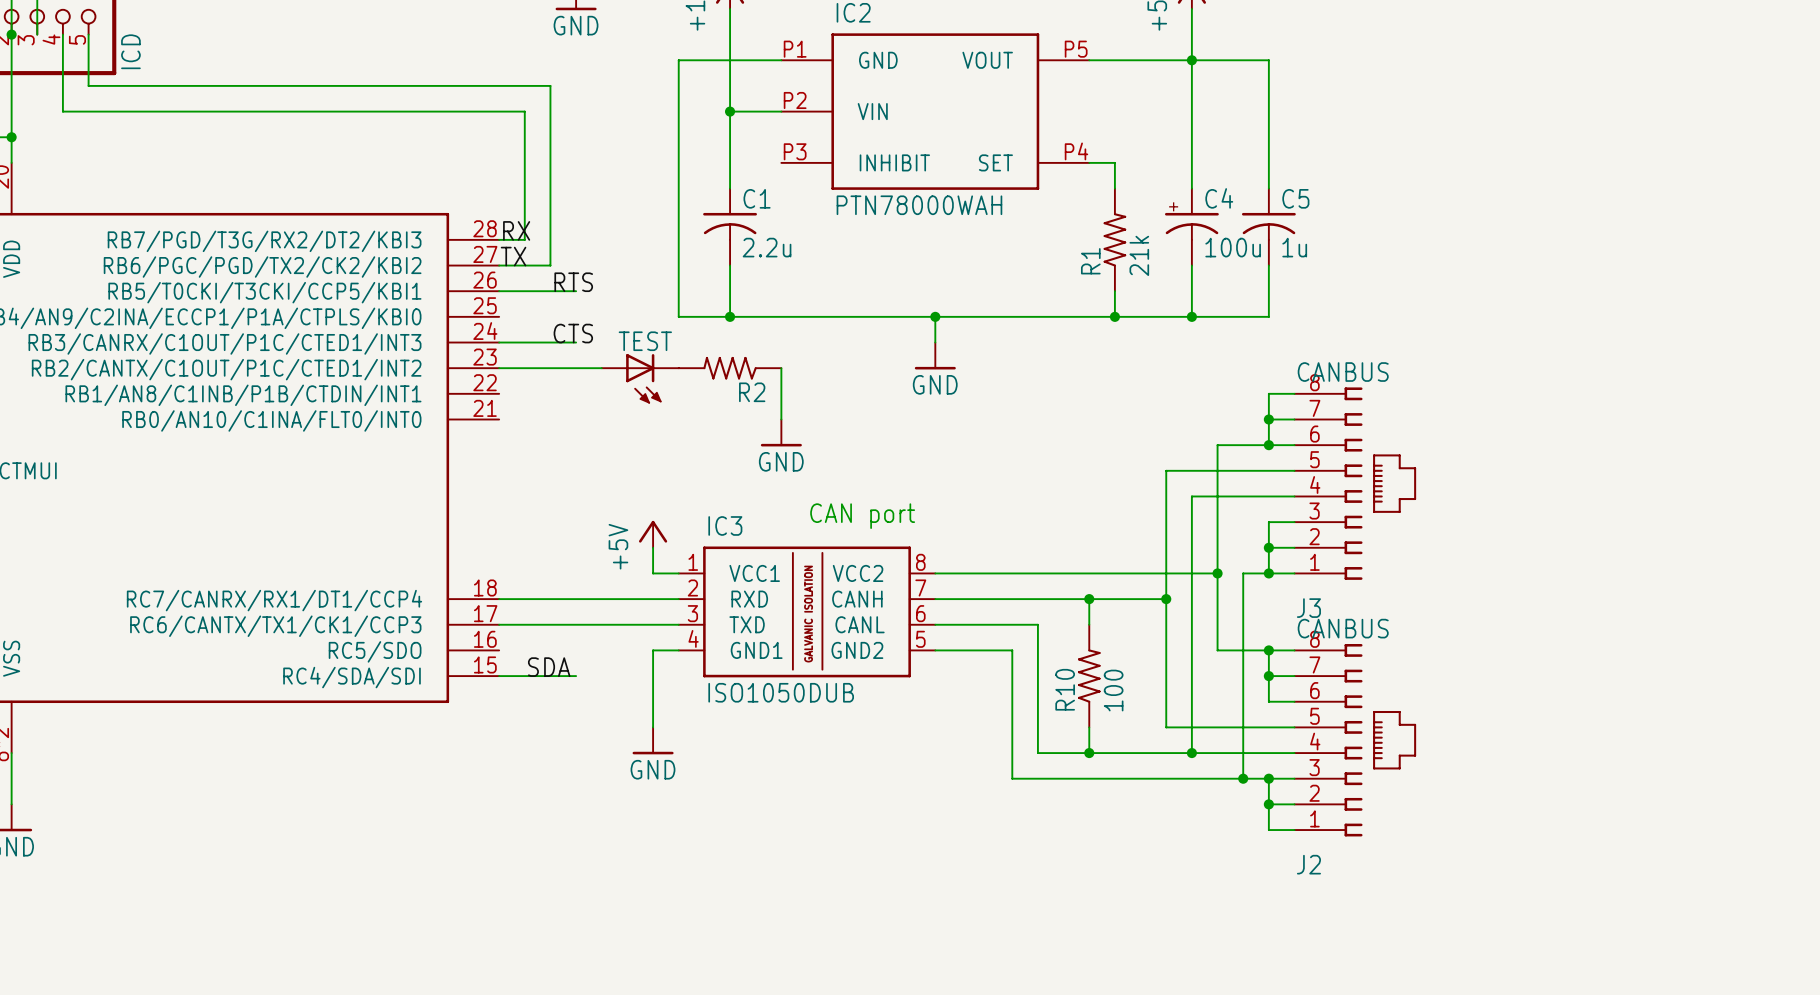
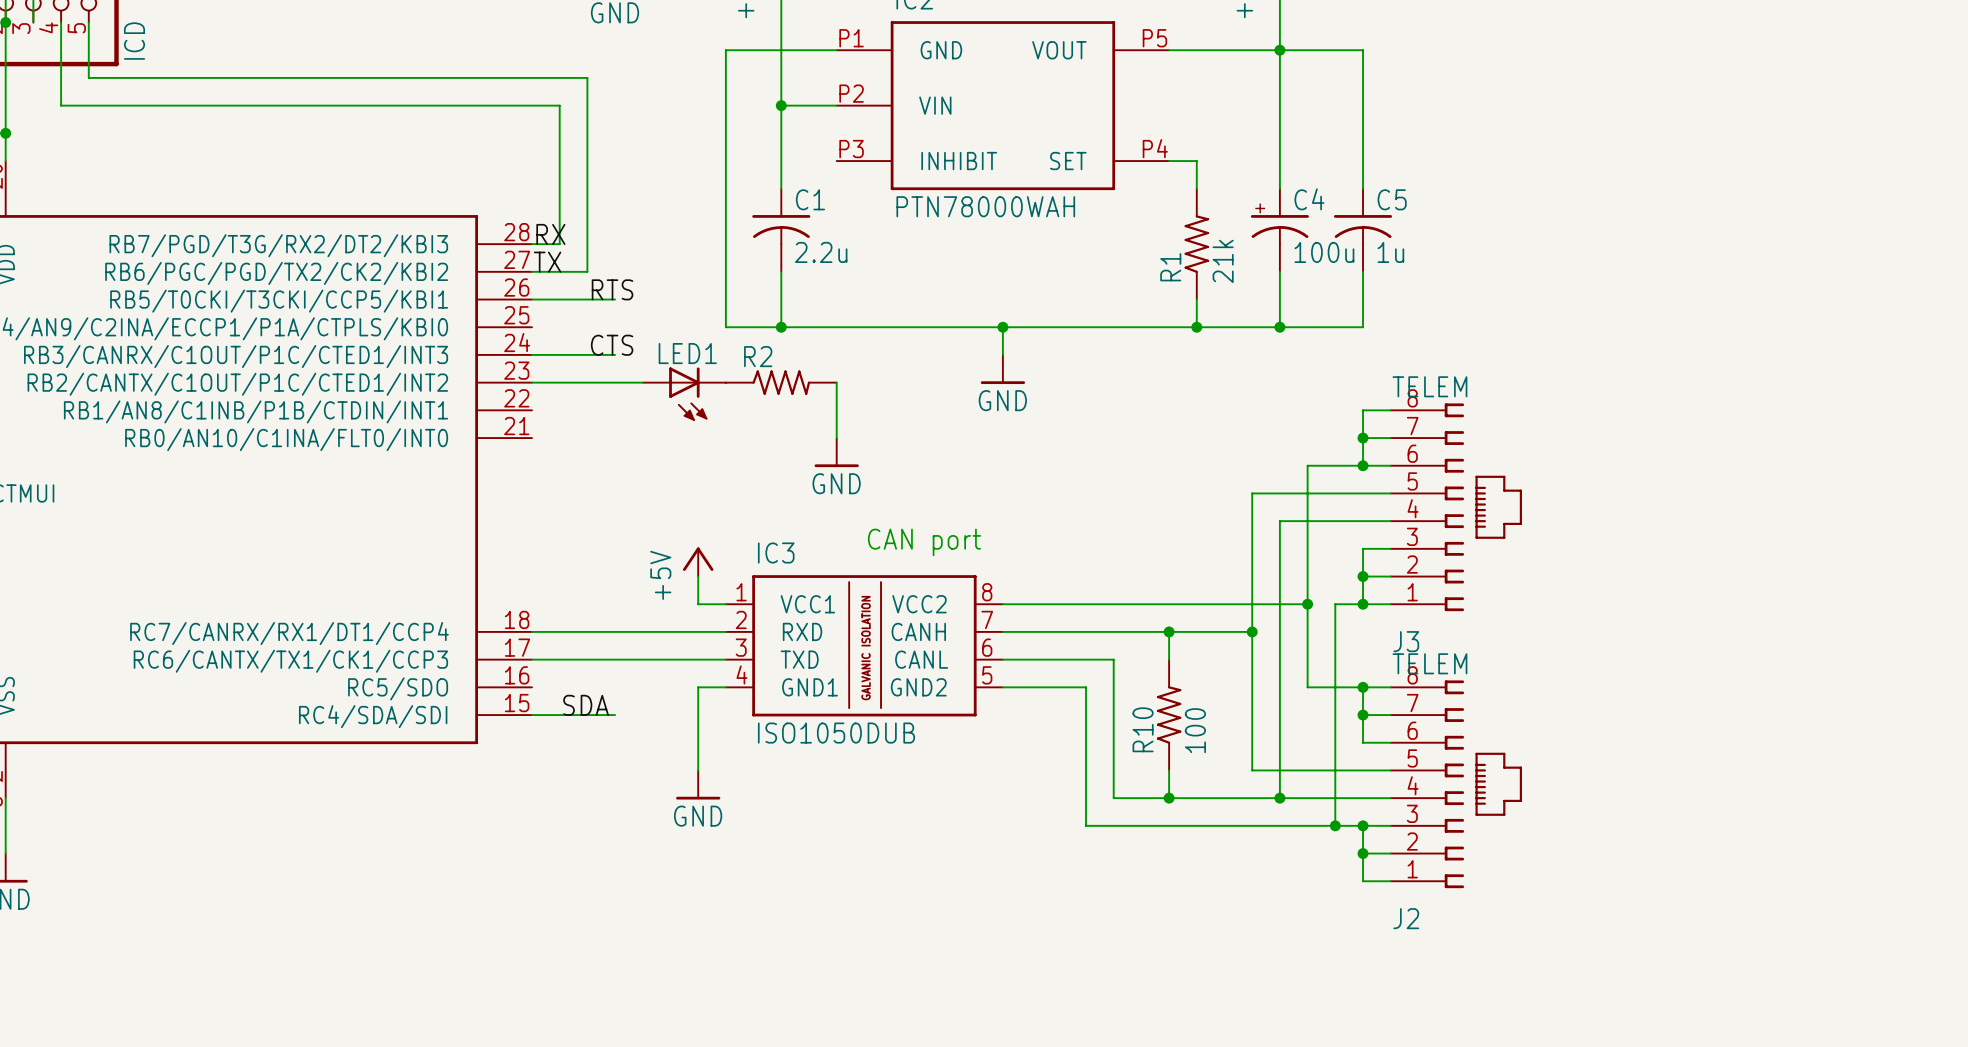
TEST name: TEST (645, 341) -> LED1 (687, 353)
R2 rotation: 0° (730, 368) -> 180° (781, 382)
J3 value: CANBUS (1343, 372) -> TELEM (1429, 386)
J2 value: CANBUS (1343, 628) -> TELEM (1429, 663)

